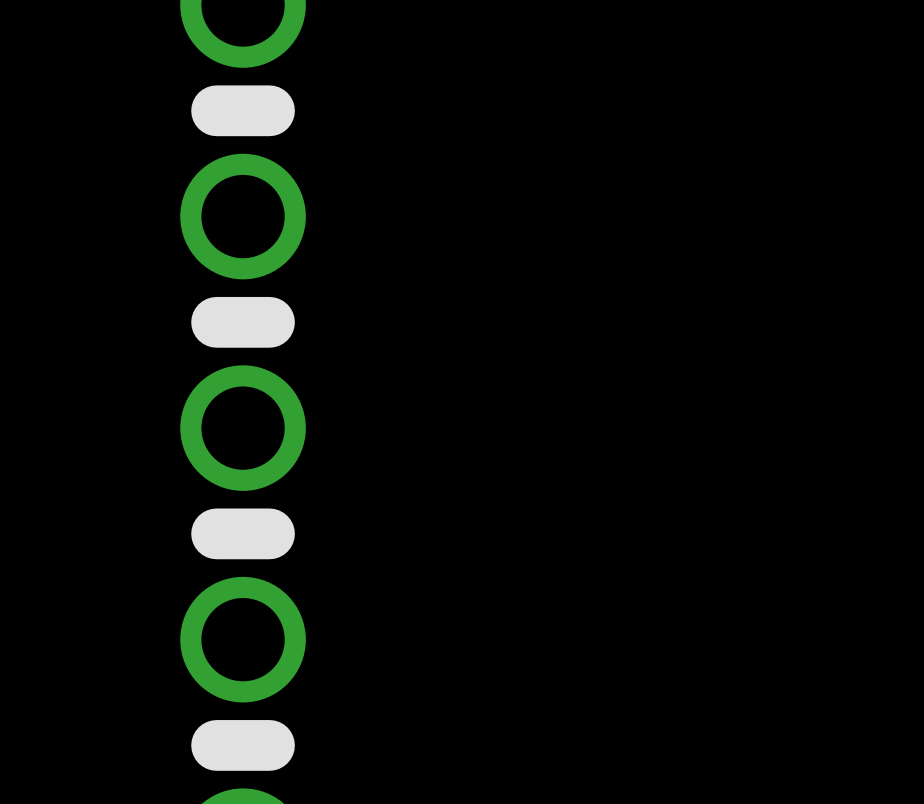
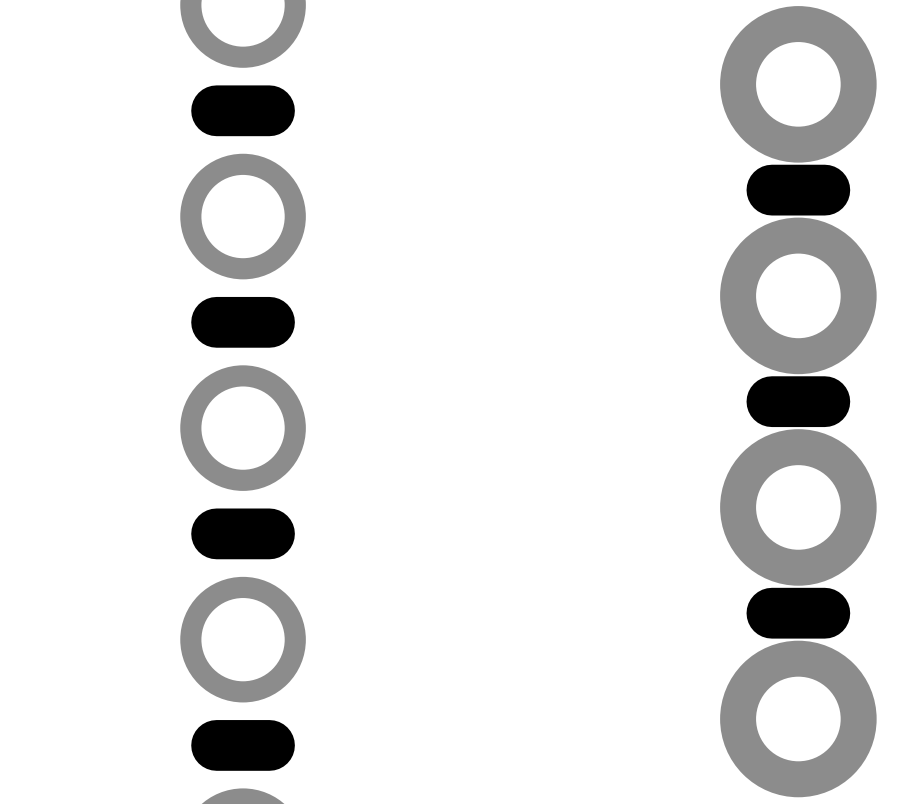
line: none -> (824, 190) (771, 190)
part: none -> (798, 401)
line: none -> (824, 401) (771, 401)
line: none -> (824, 613) (771, 613)

